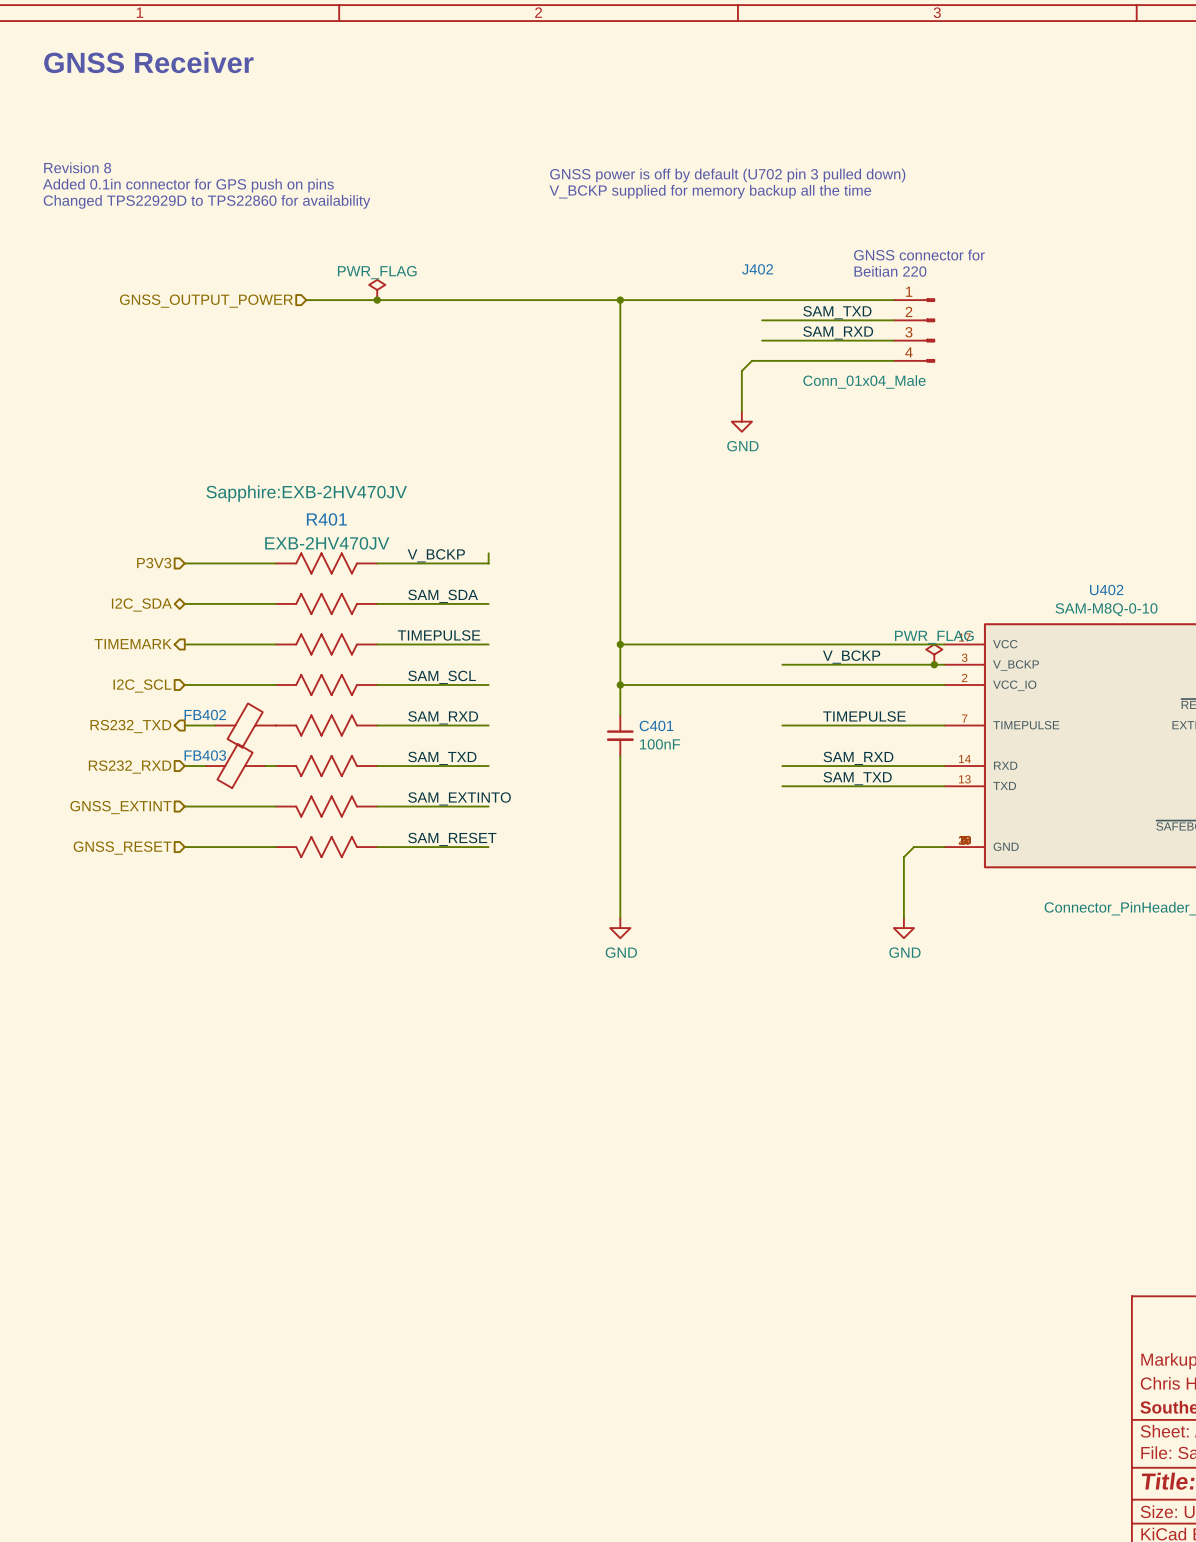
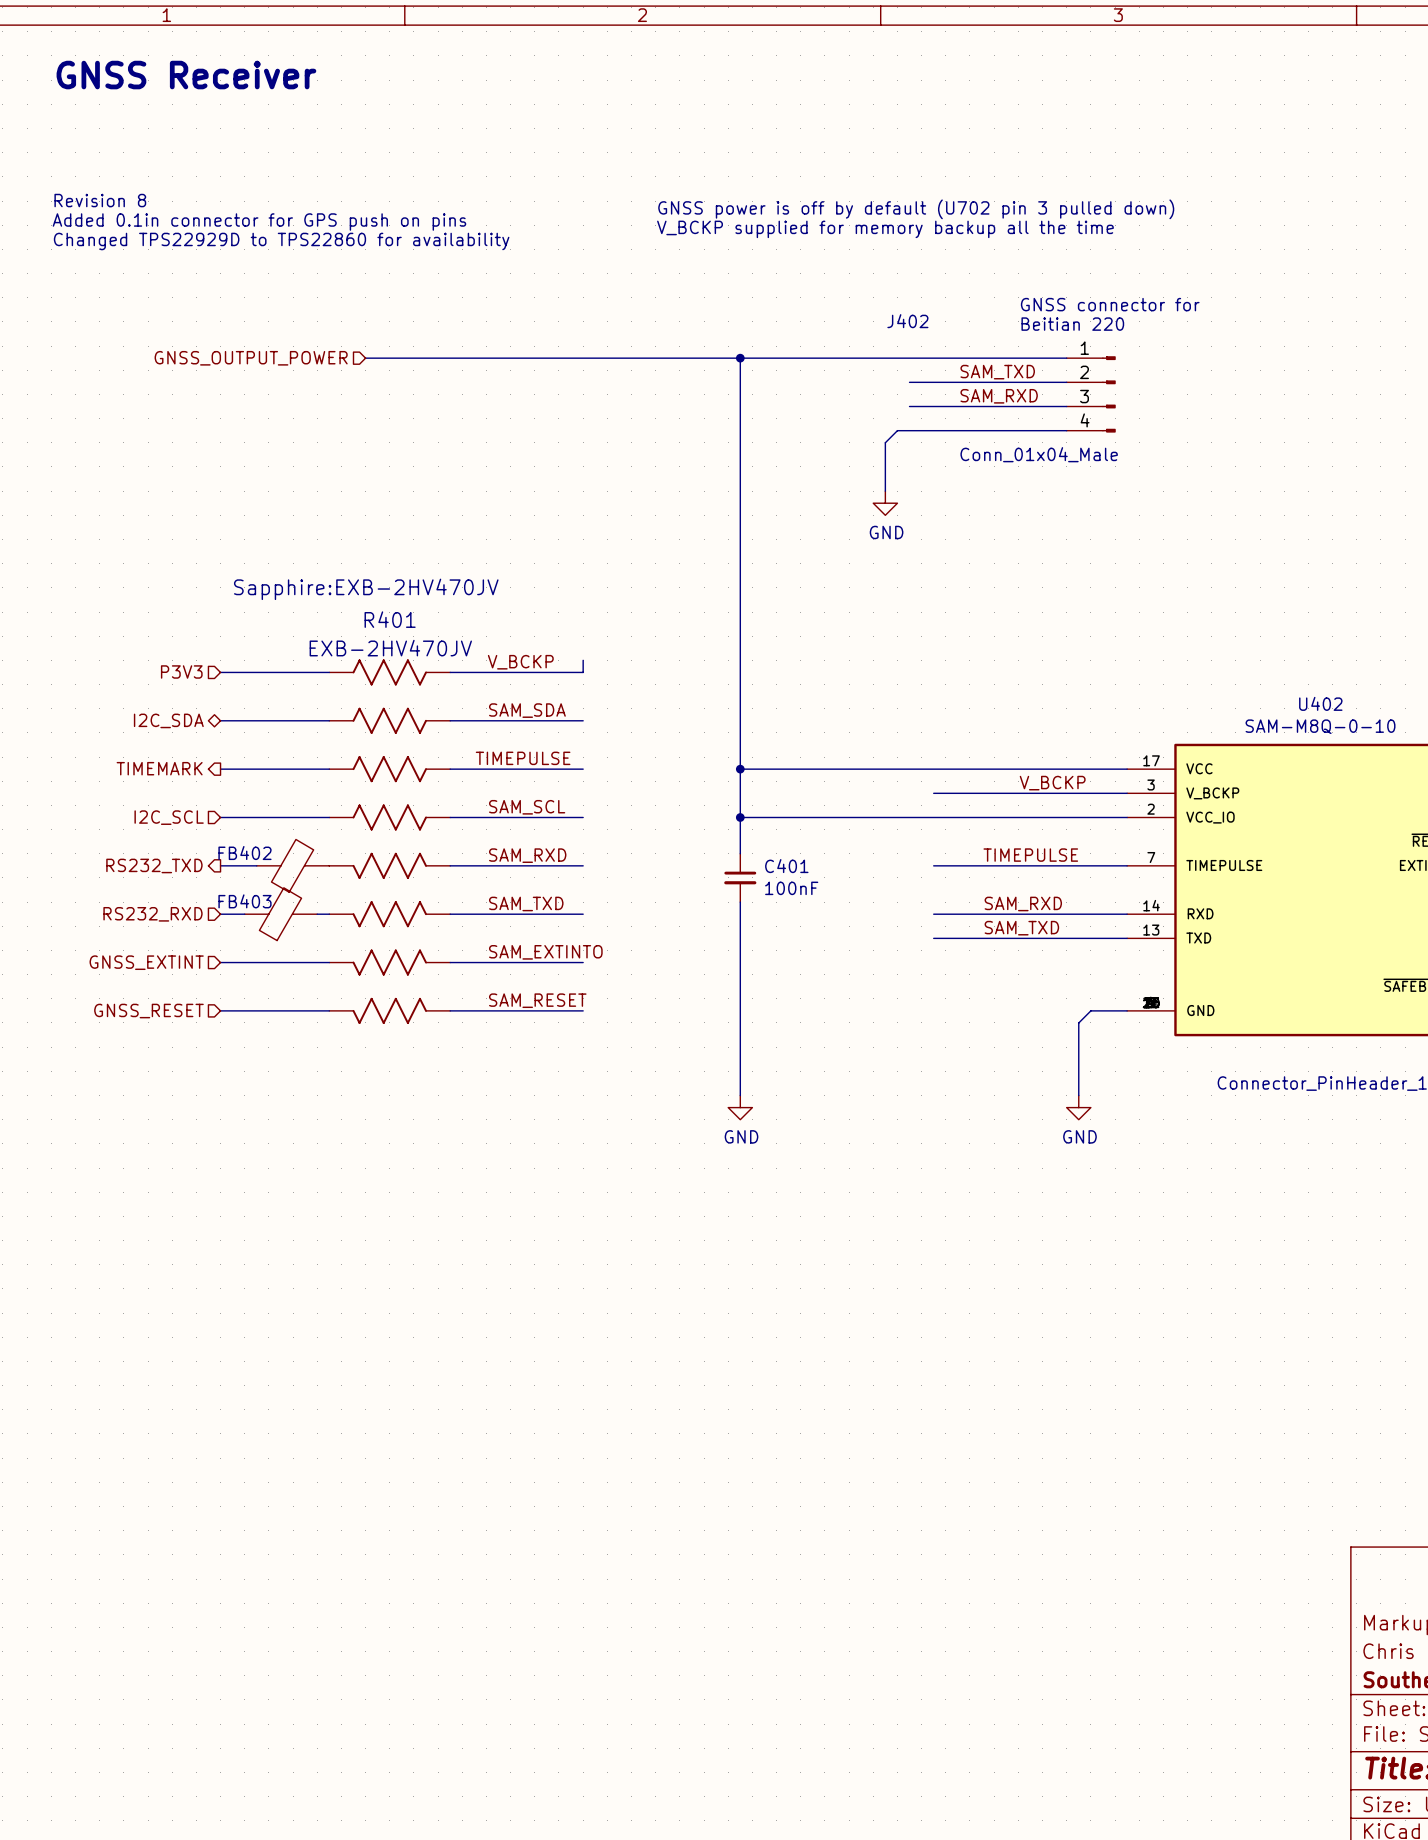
power symbol: PWR_FLAG (377, 289) -> none
junction: (377, 300) -> none
power symbol: PWR_FLAG (934, 654) -> none
label position: V_BCKP (851, 657) -> V_BCKP (1052, 783)
junction: (934, 664) -> none

